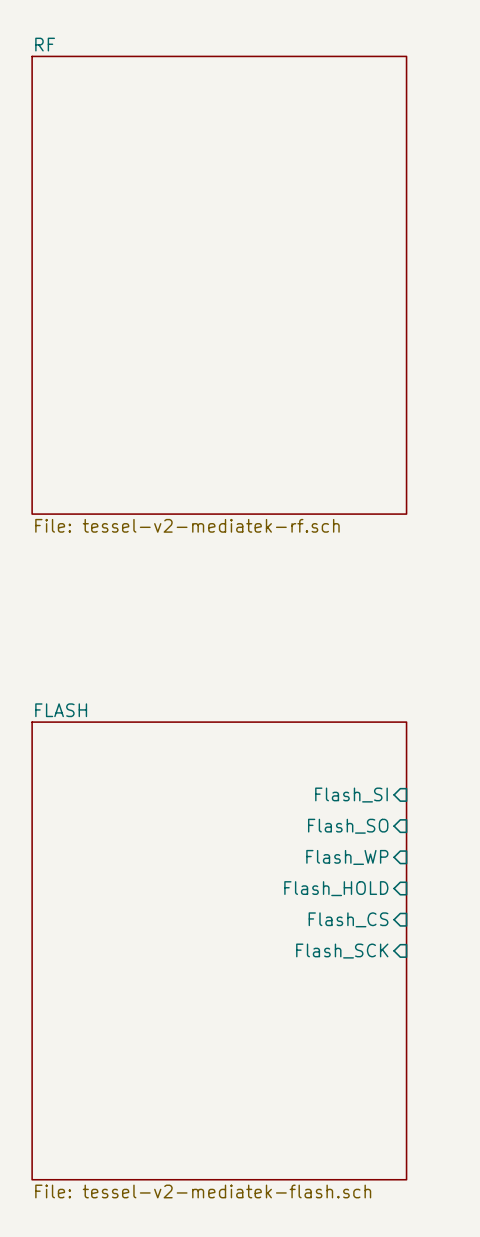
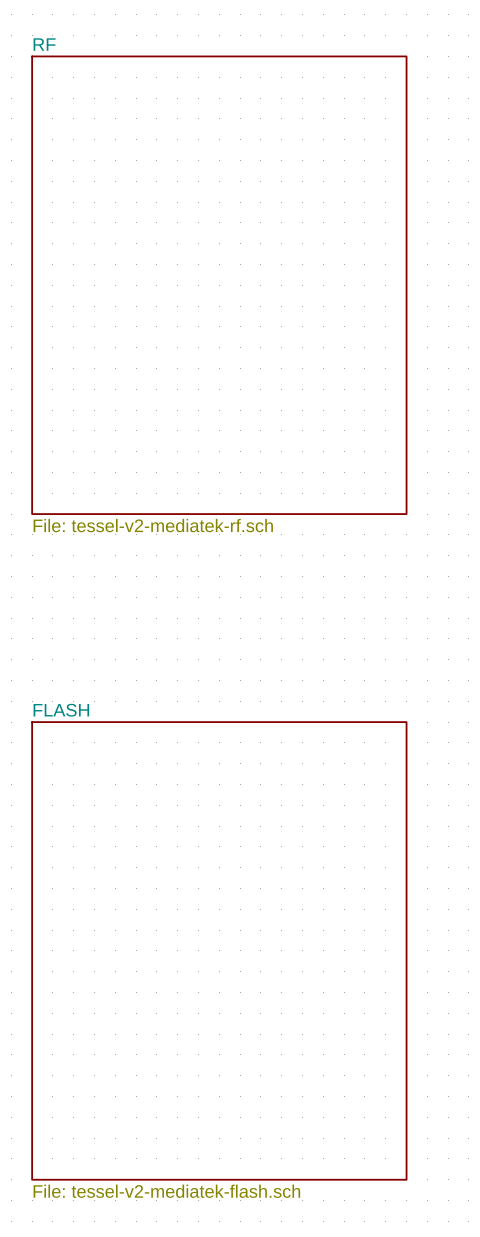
sheet pin: Flash_SI (351, 795) -> none
sheet pin: Flash_SO (348, 826) -> none
sheet pin: Flash_WP (347, 857) -> none
sheet pin: Flash_HOLD (336, 888) -> none
sheet pin: Flash_CS (348, 919) -> none
sheet pin: Flash_SCK (342, 951) -> none

